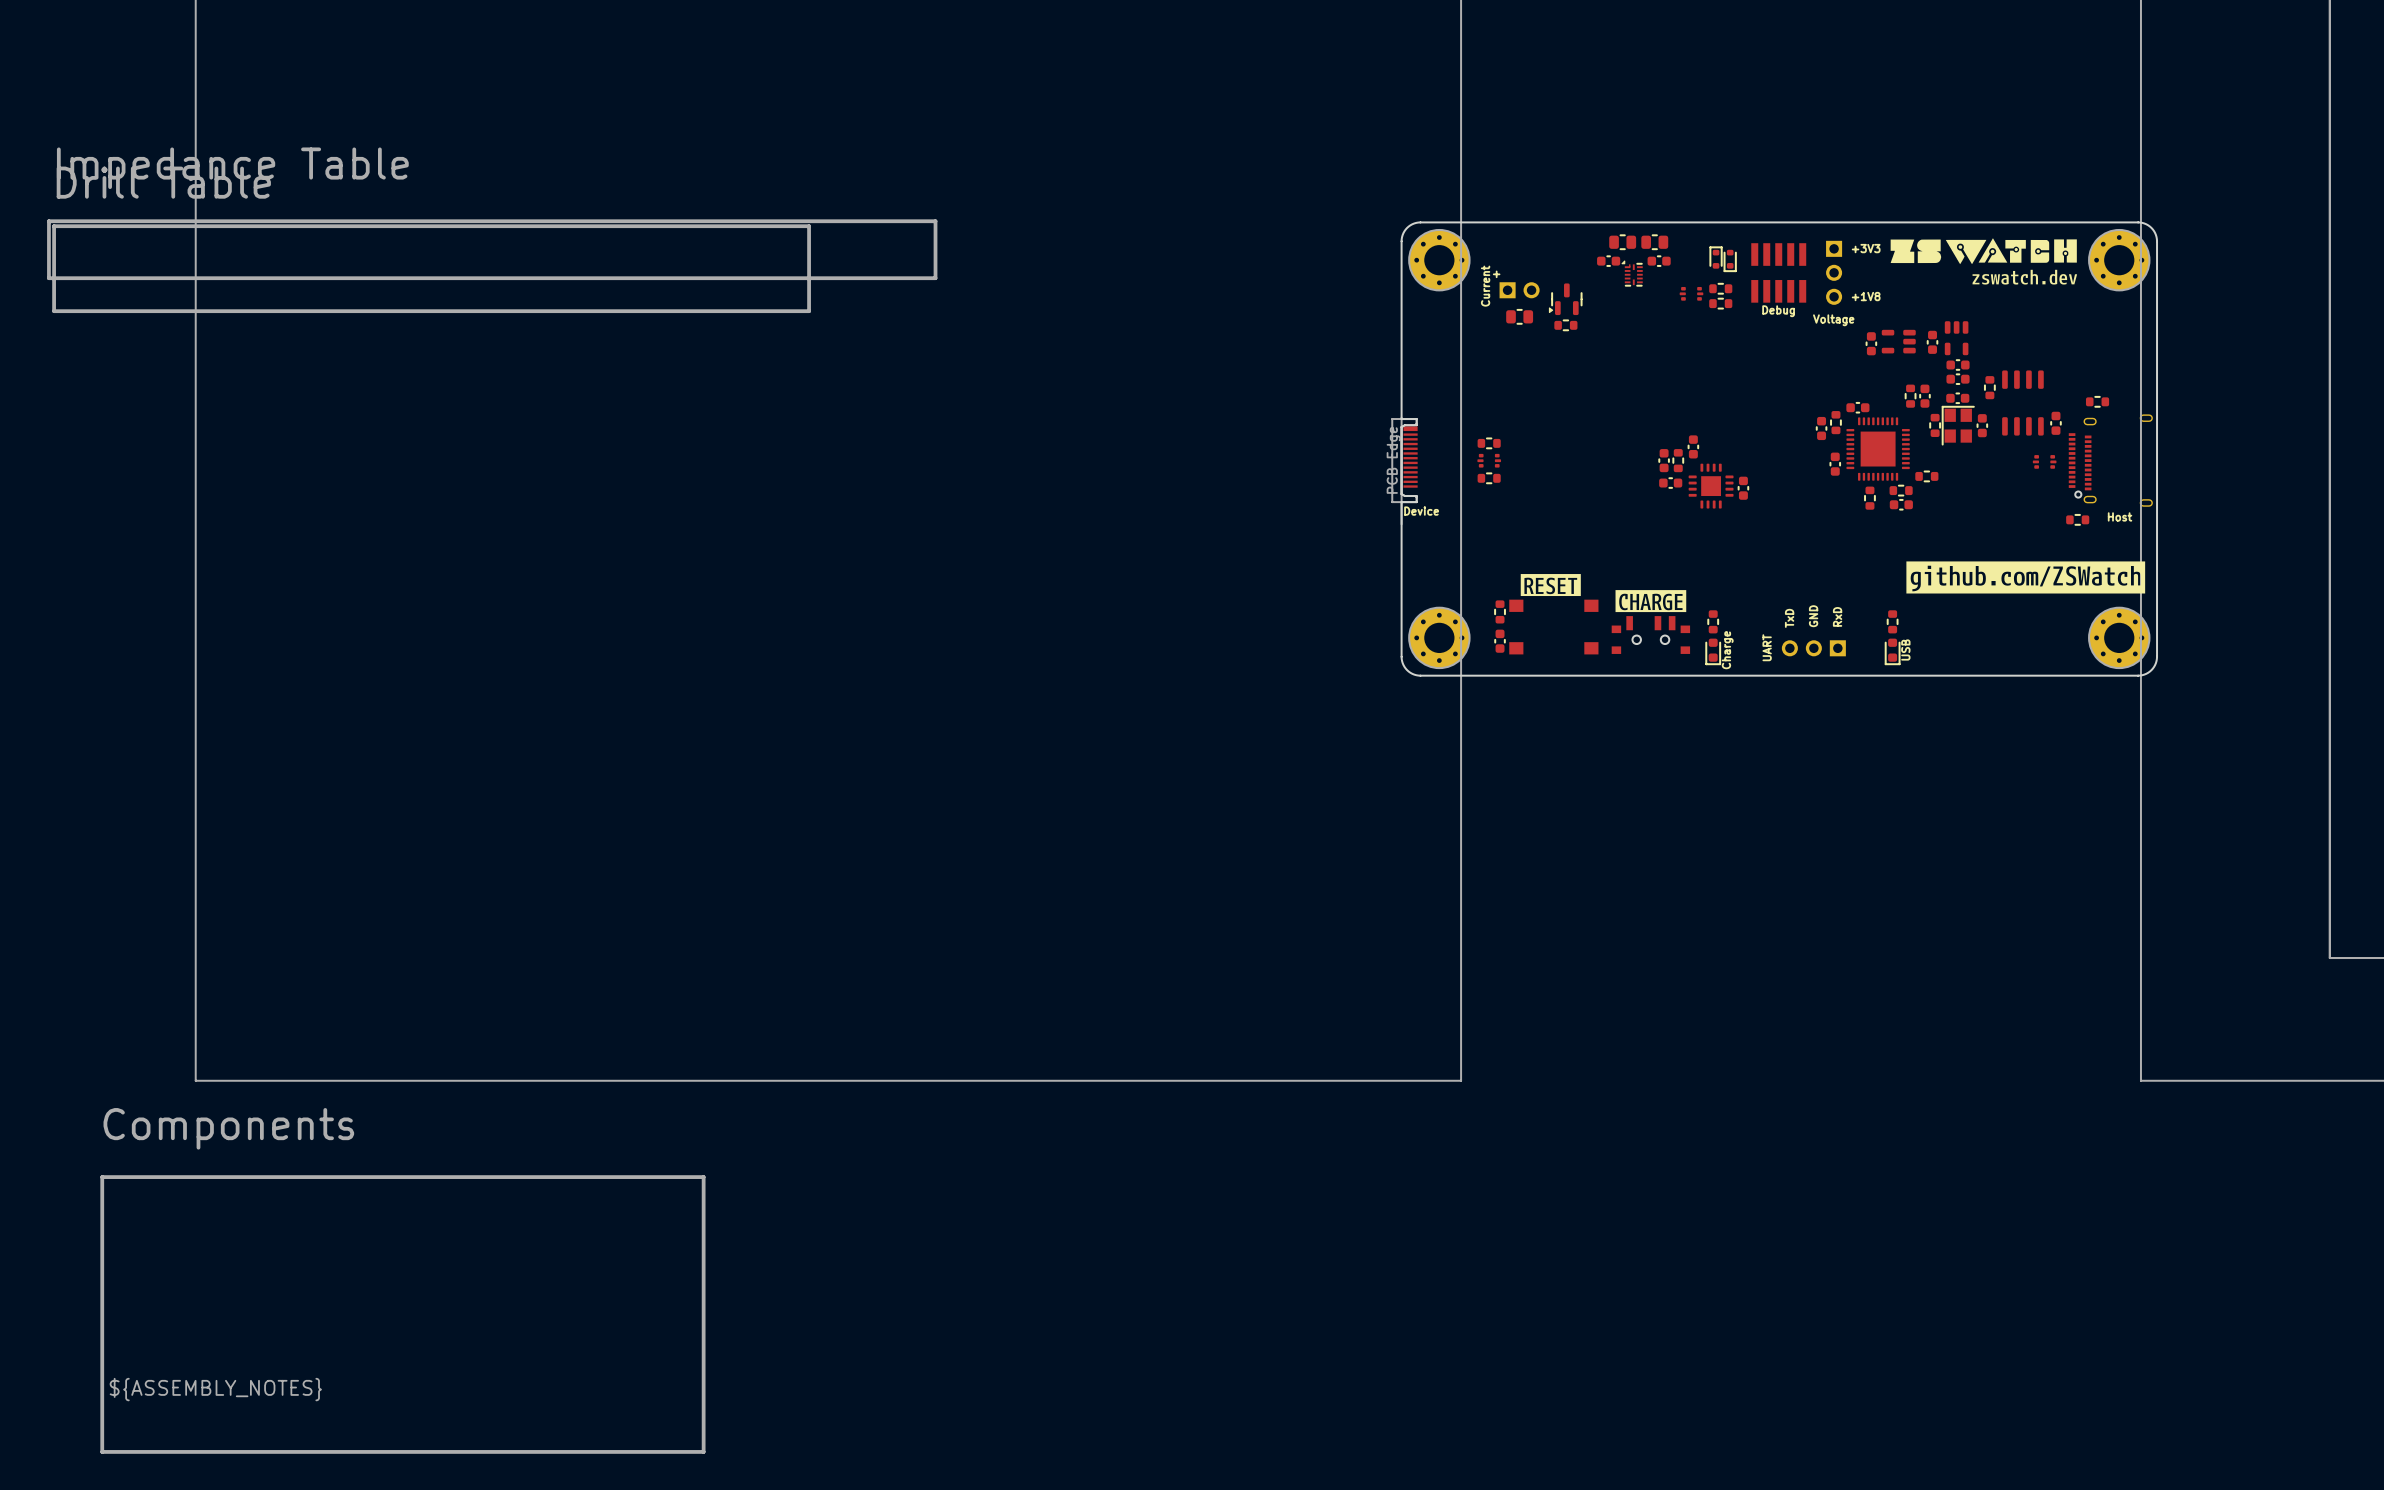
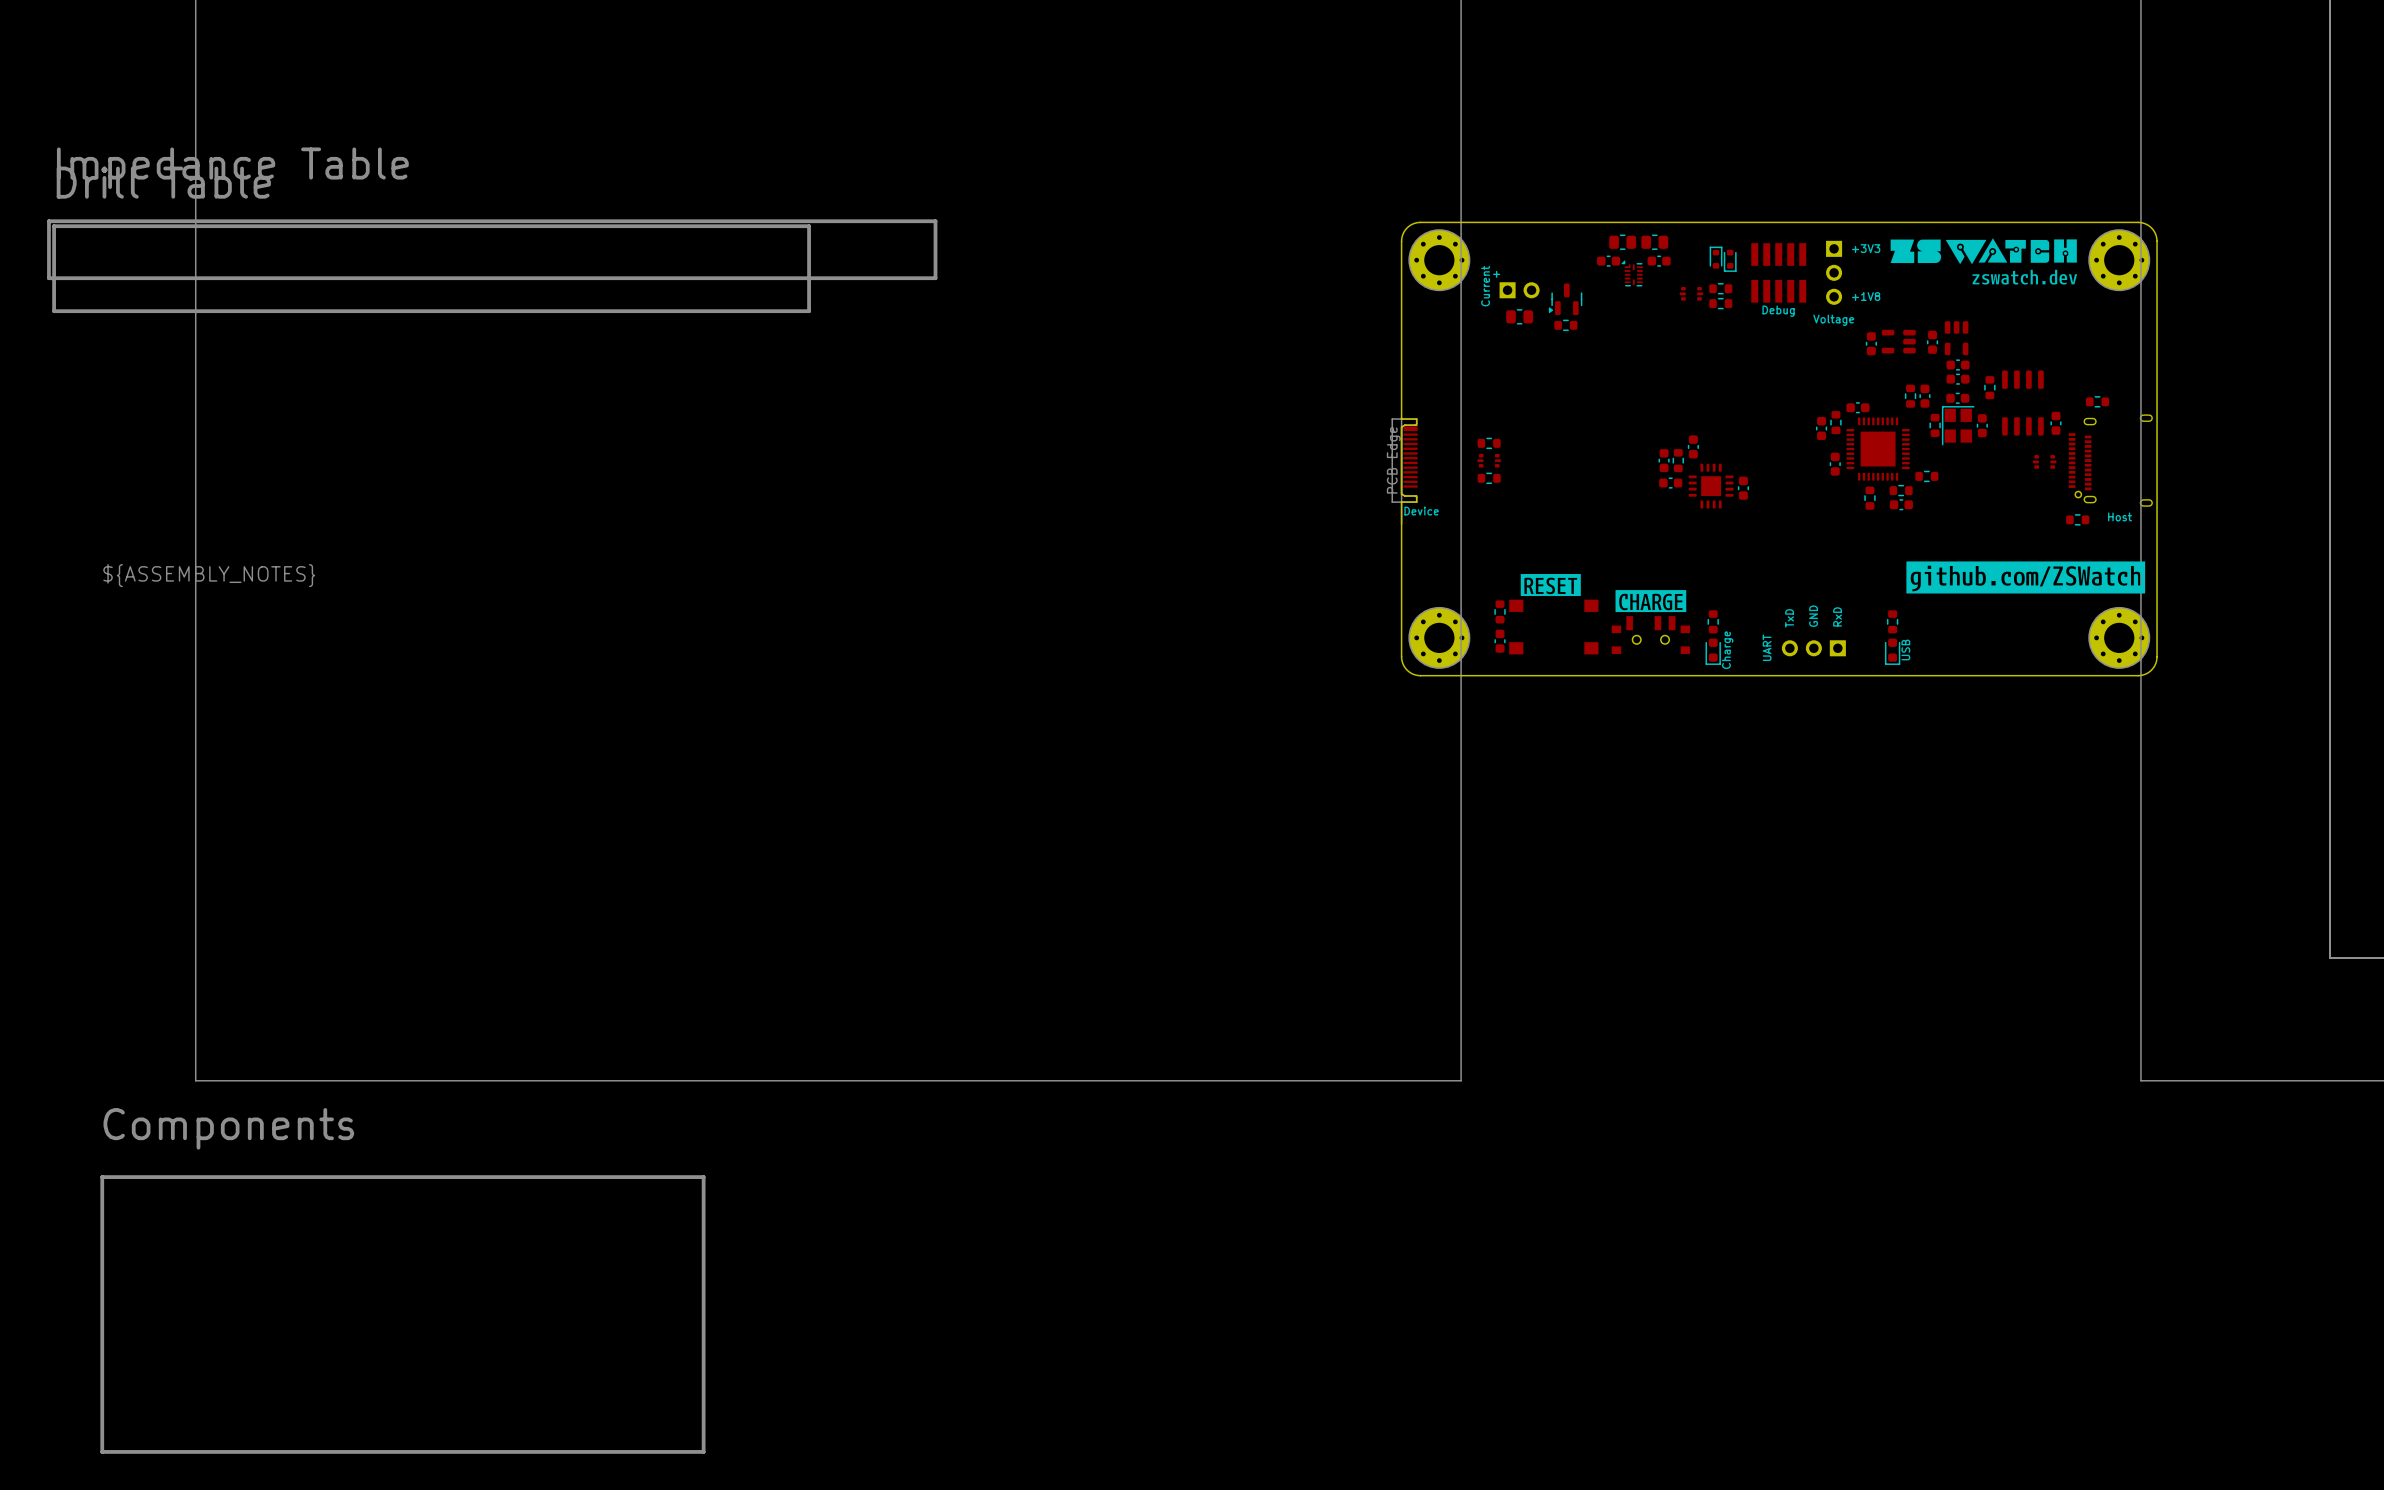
text: none -> ${ASSEMBLY_NOTES} (209, 575)
text: ${ASSEMBLY_NOTES} (215, 1389) -> none

